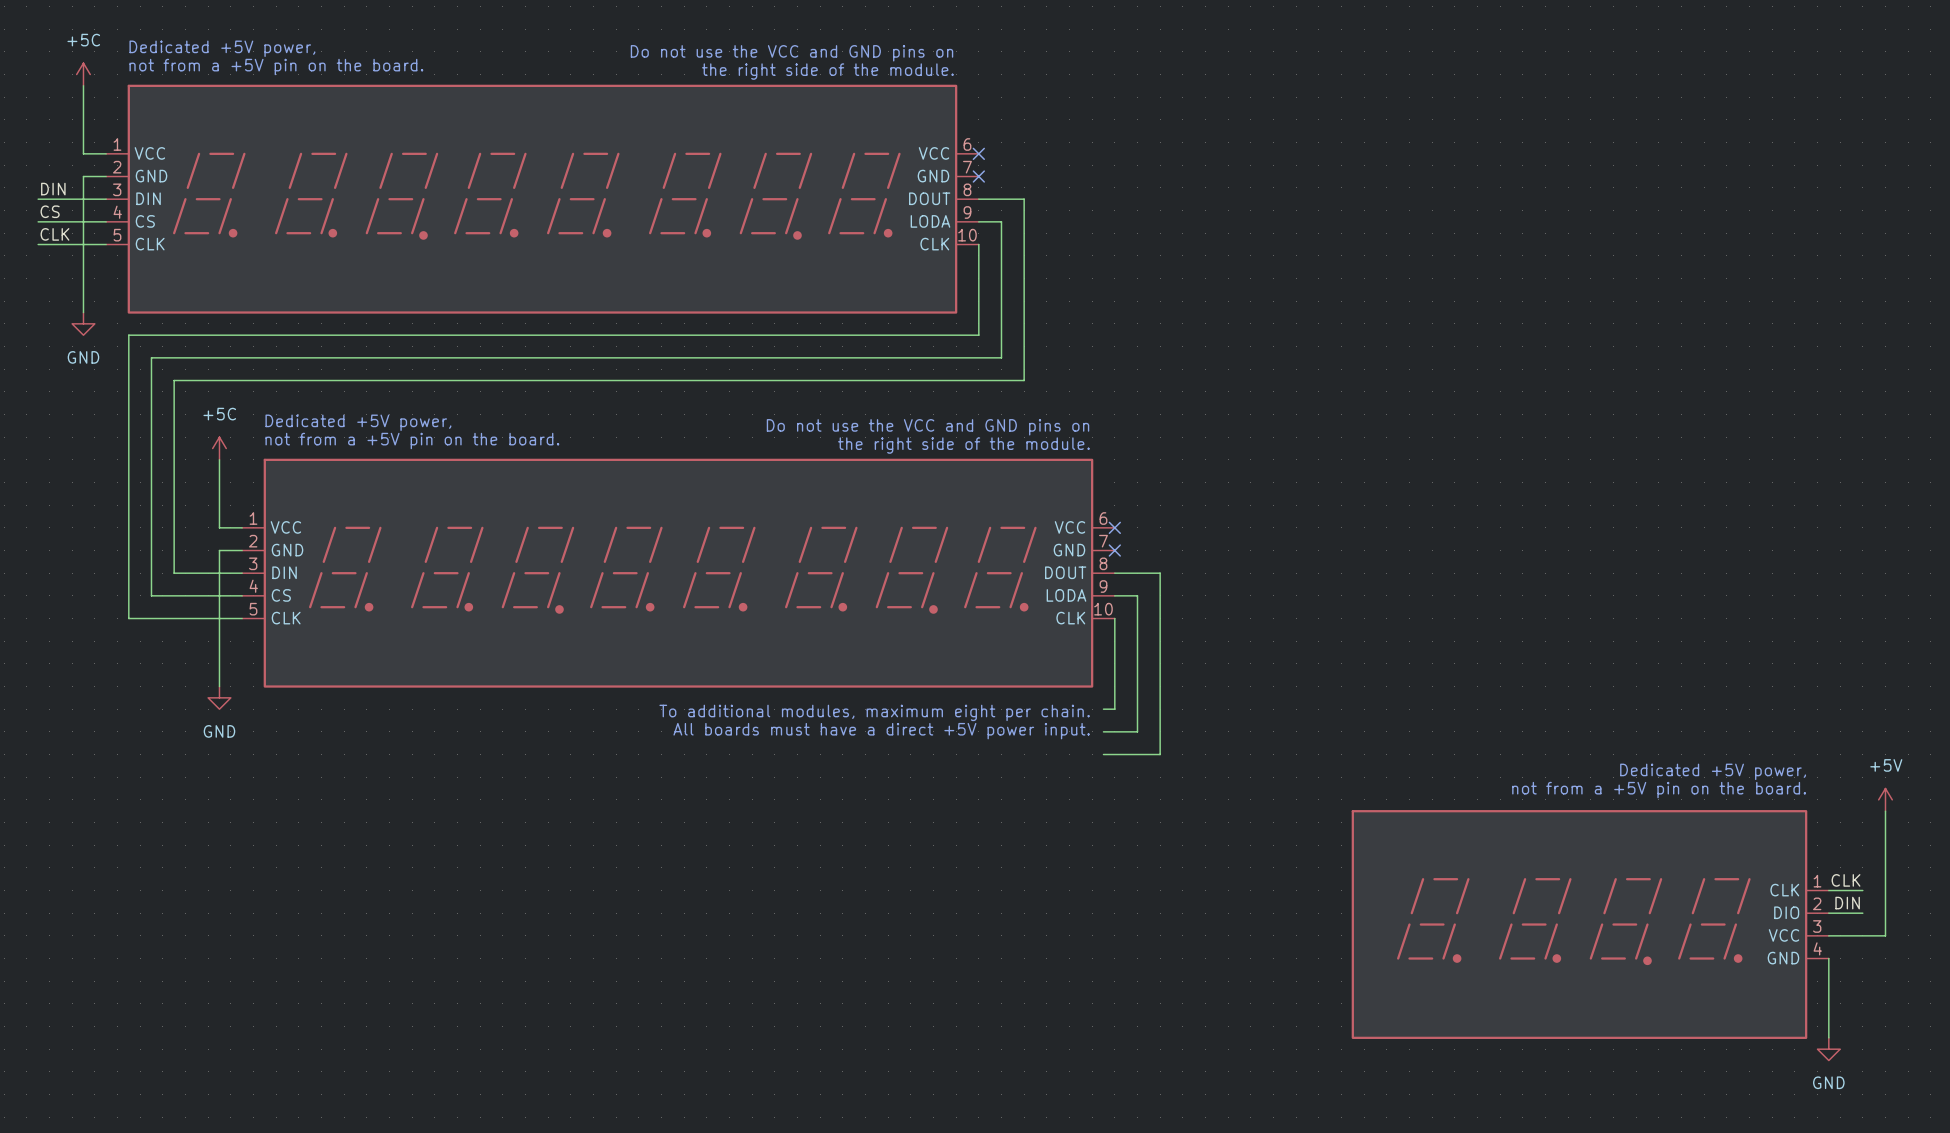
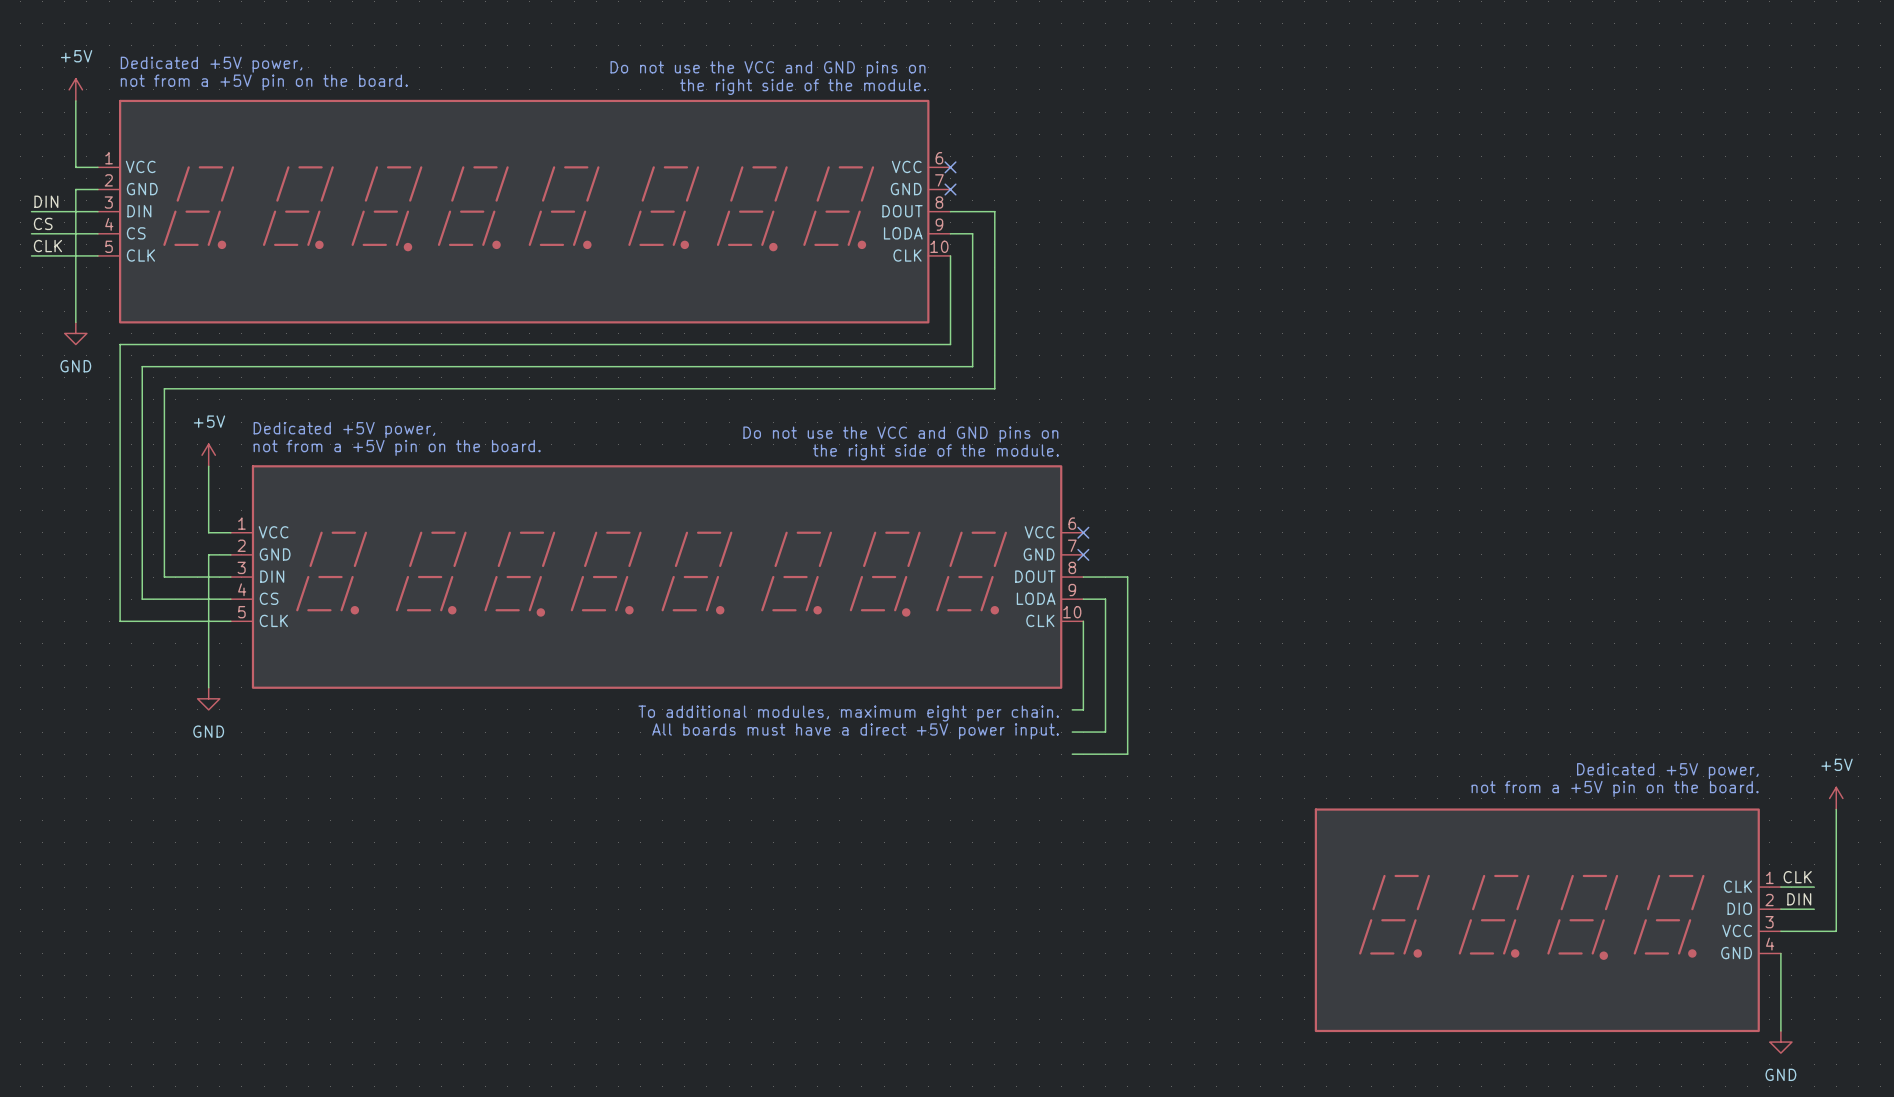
power symbol: +5C (83, 74) -> +5V (75, 89)
power symbol: +5C (219, 448) -> +5V (208, 455)

